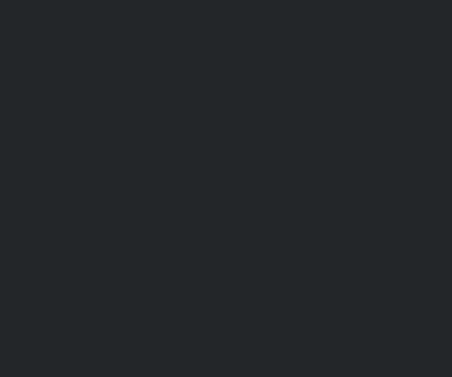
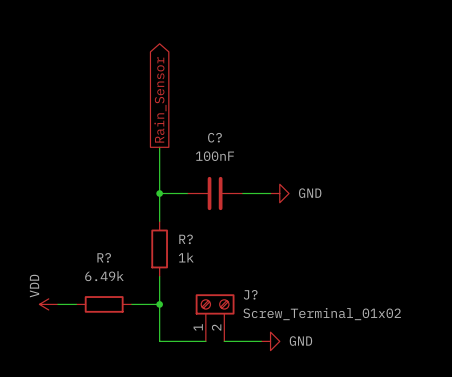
global label: none -> Rain_Sensor (160, 99)
wire: none -> (159, 147) (159, 221)
wire: none -> (159, 193) (187, 193)
junction: none -> (159, 193)
C?: none -> 100nF (215, 193)
wire: none -> (242, 193) (270, 193)
power symbol: none -> GND (279, 193)
R?: none -> 1k (159, 248)
wire: none -> (159, 276) (159, 341) (205, 341)
power symbol: none -> VDD (48, 304)
wire: none -> (57, 304) (76, 304)
R?: none -> 6.49k (104, 304)
wire: none -> (131, 304) (159, 304)
junction: none -> (159, 304)
J?: none -> Screw_Terminal_01x02 (215, 317)
wire: none -> (224, 341) (261, 341)
power symbol: none -> GND (270, 341)

